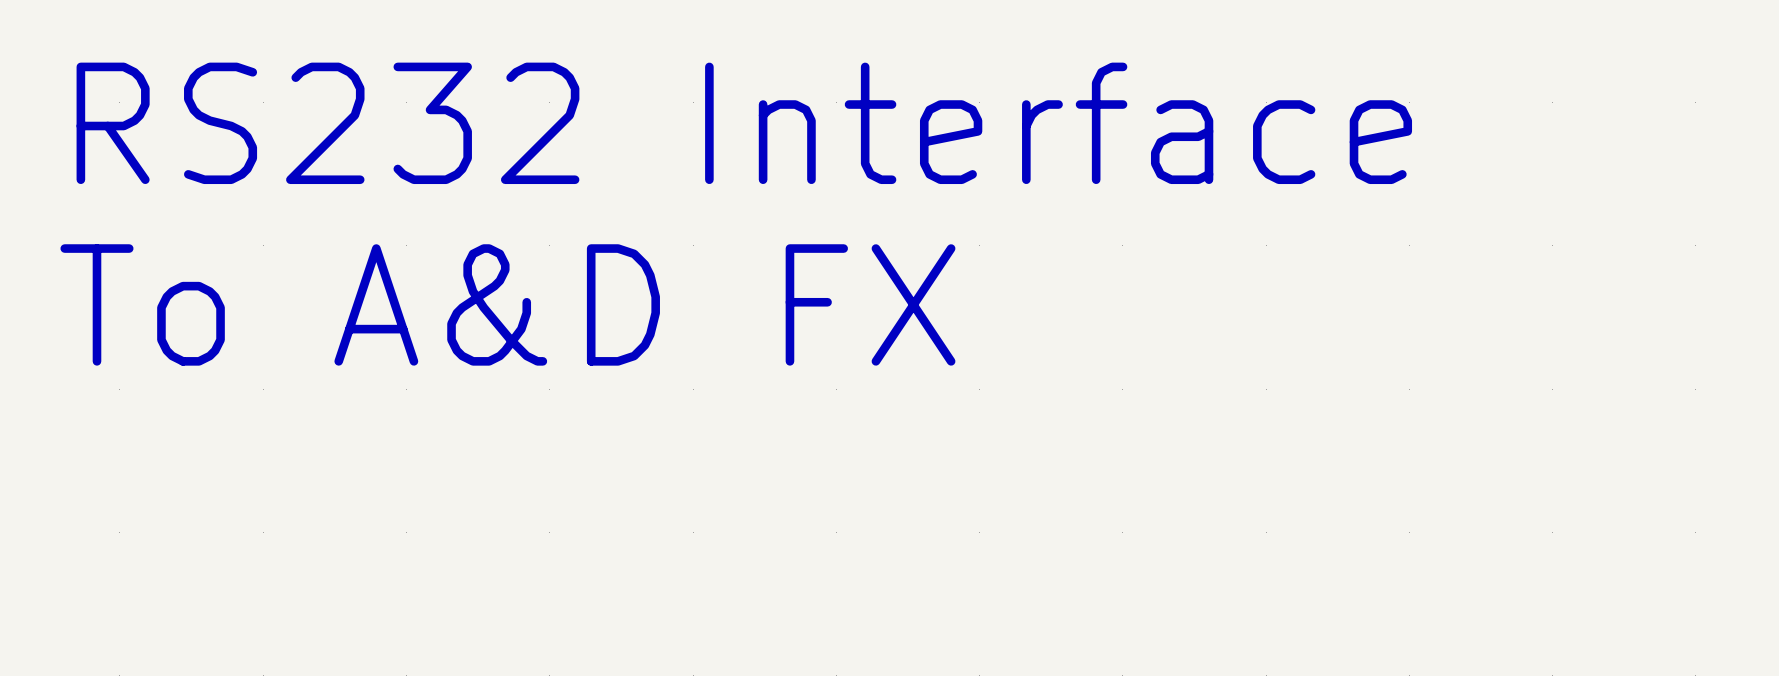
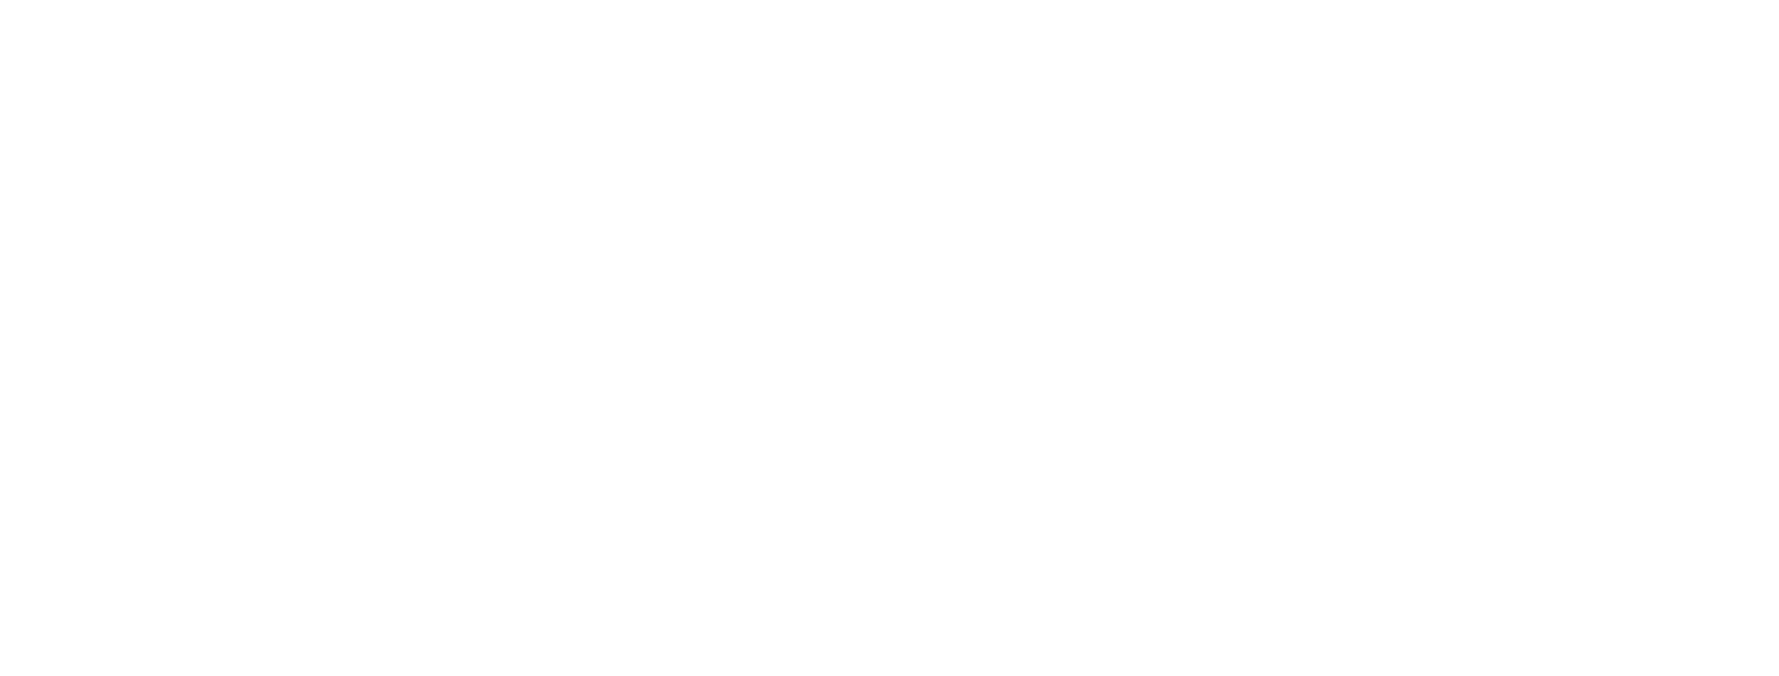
text: RS232 Interface (744, 123) -> none
text: To A&D FX (507, 304) -> none

